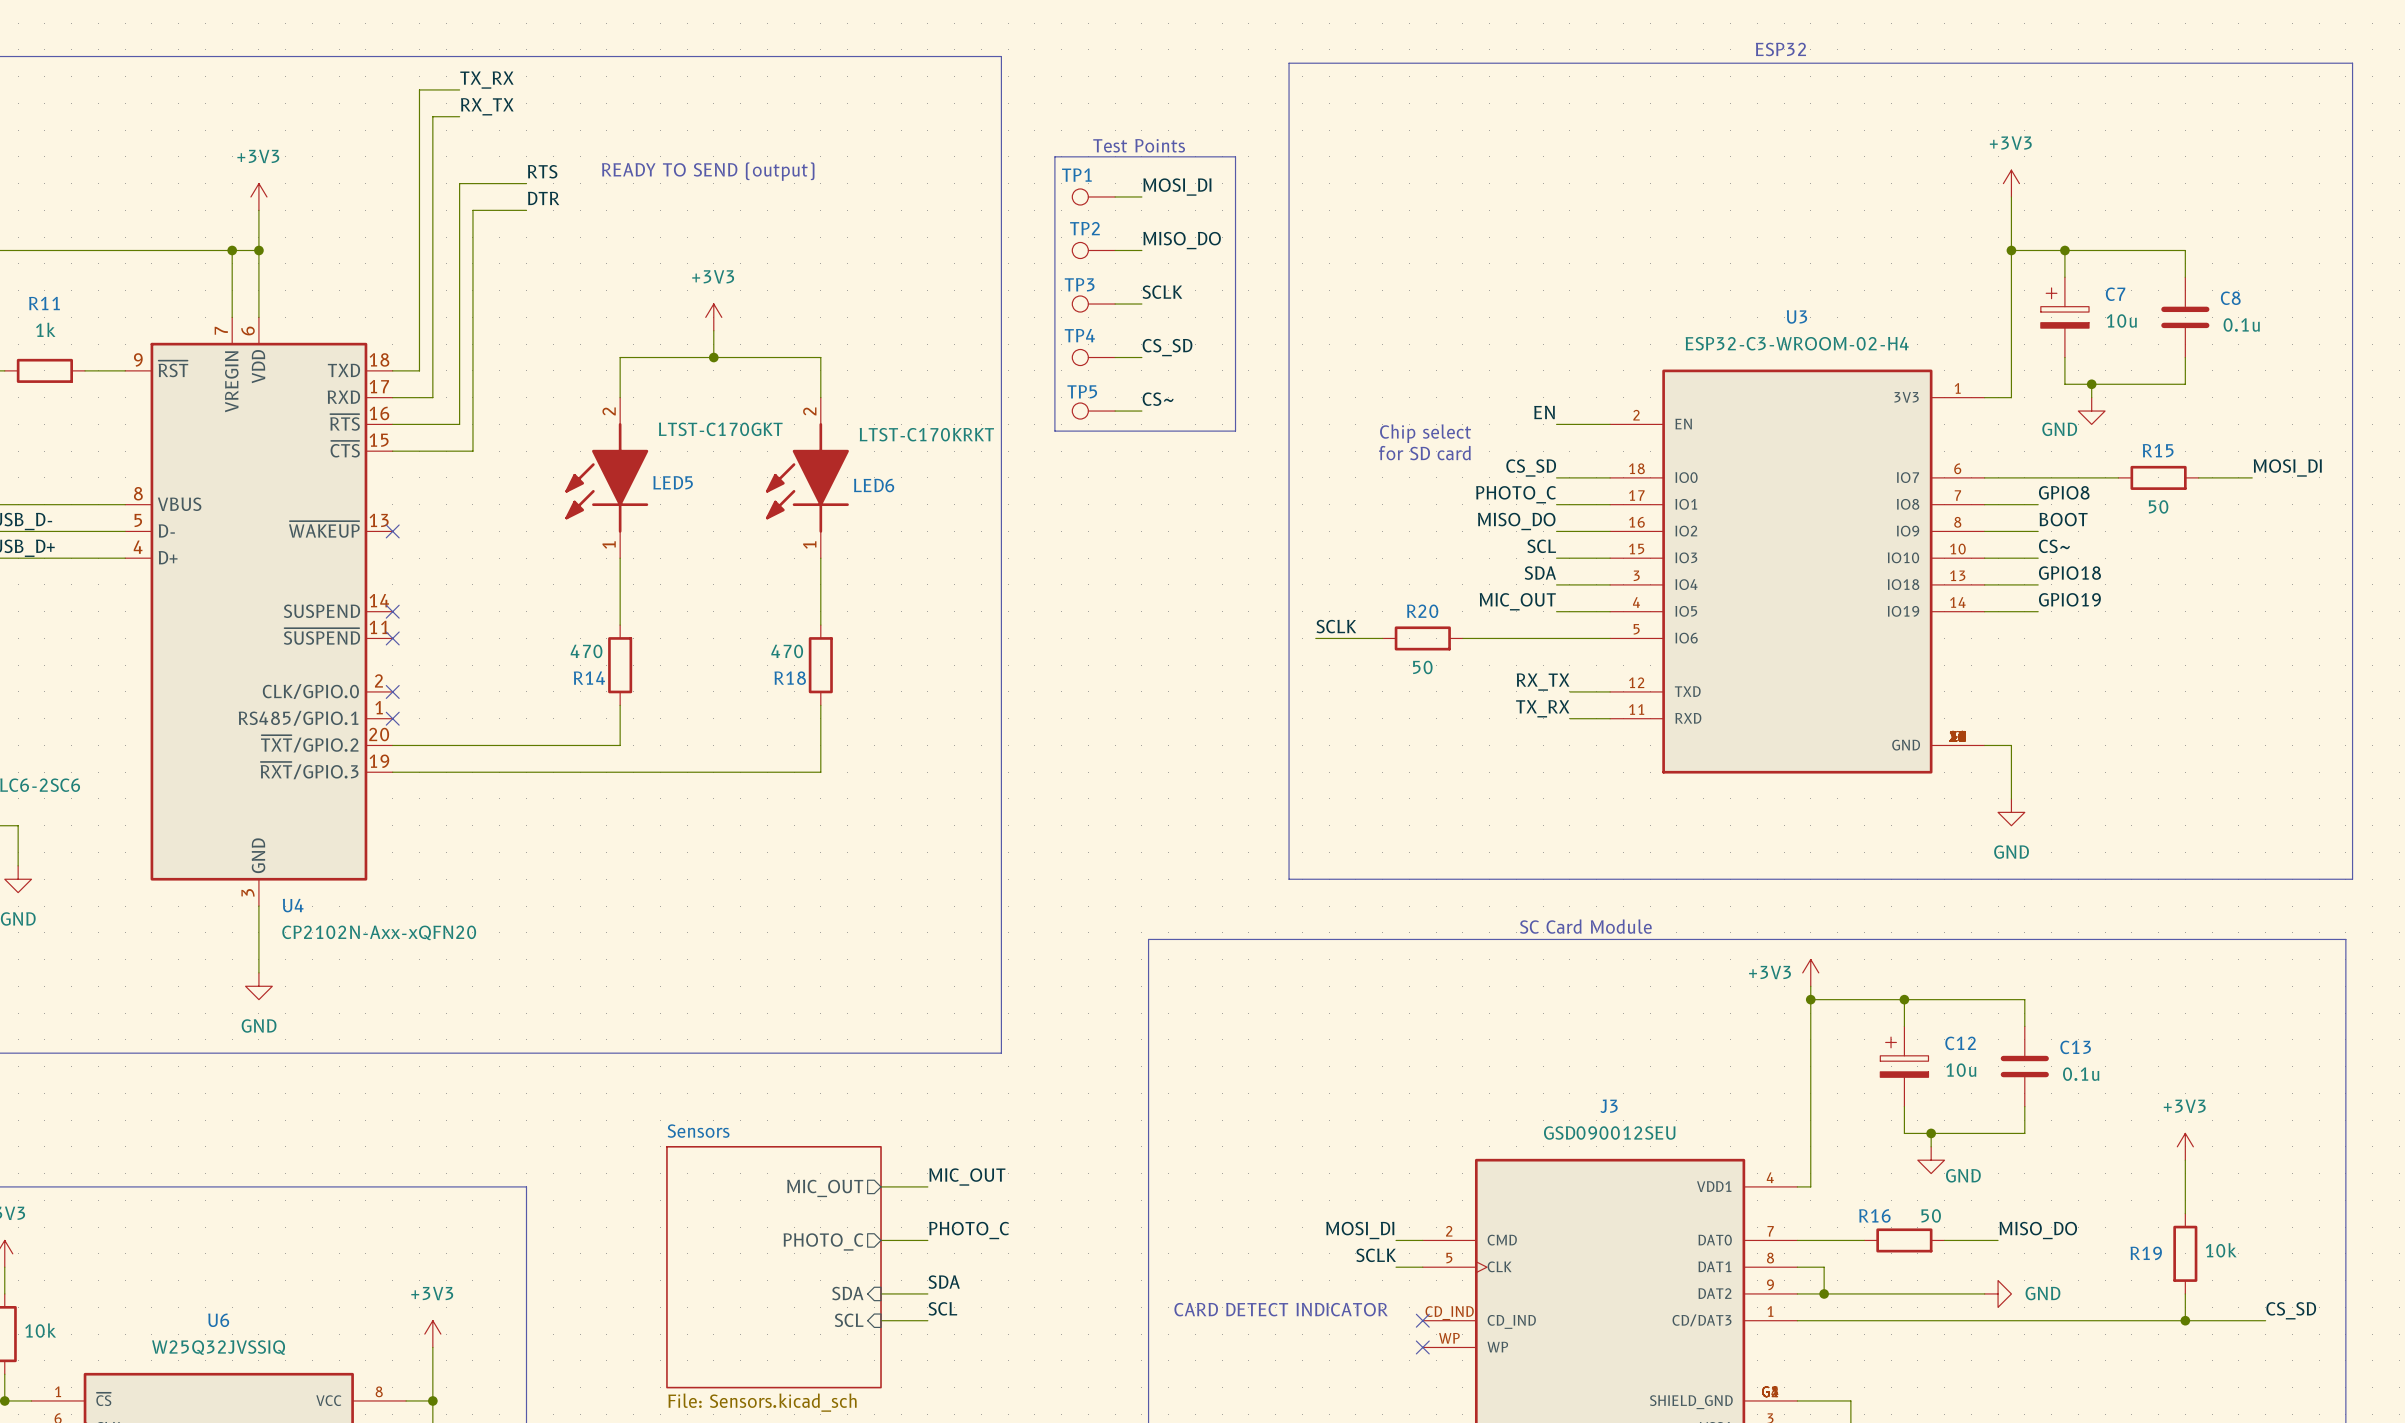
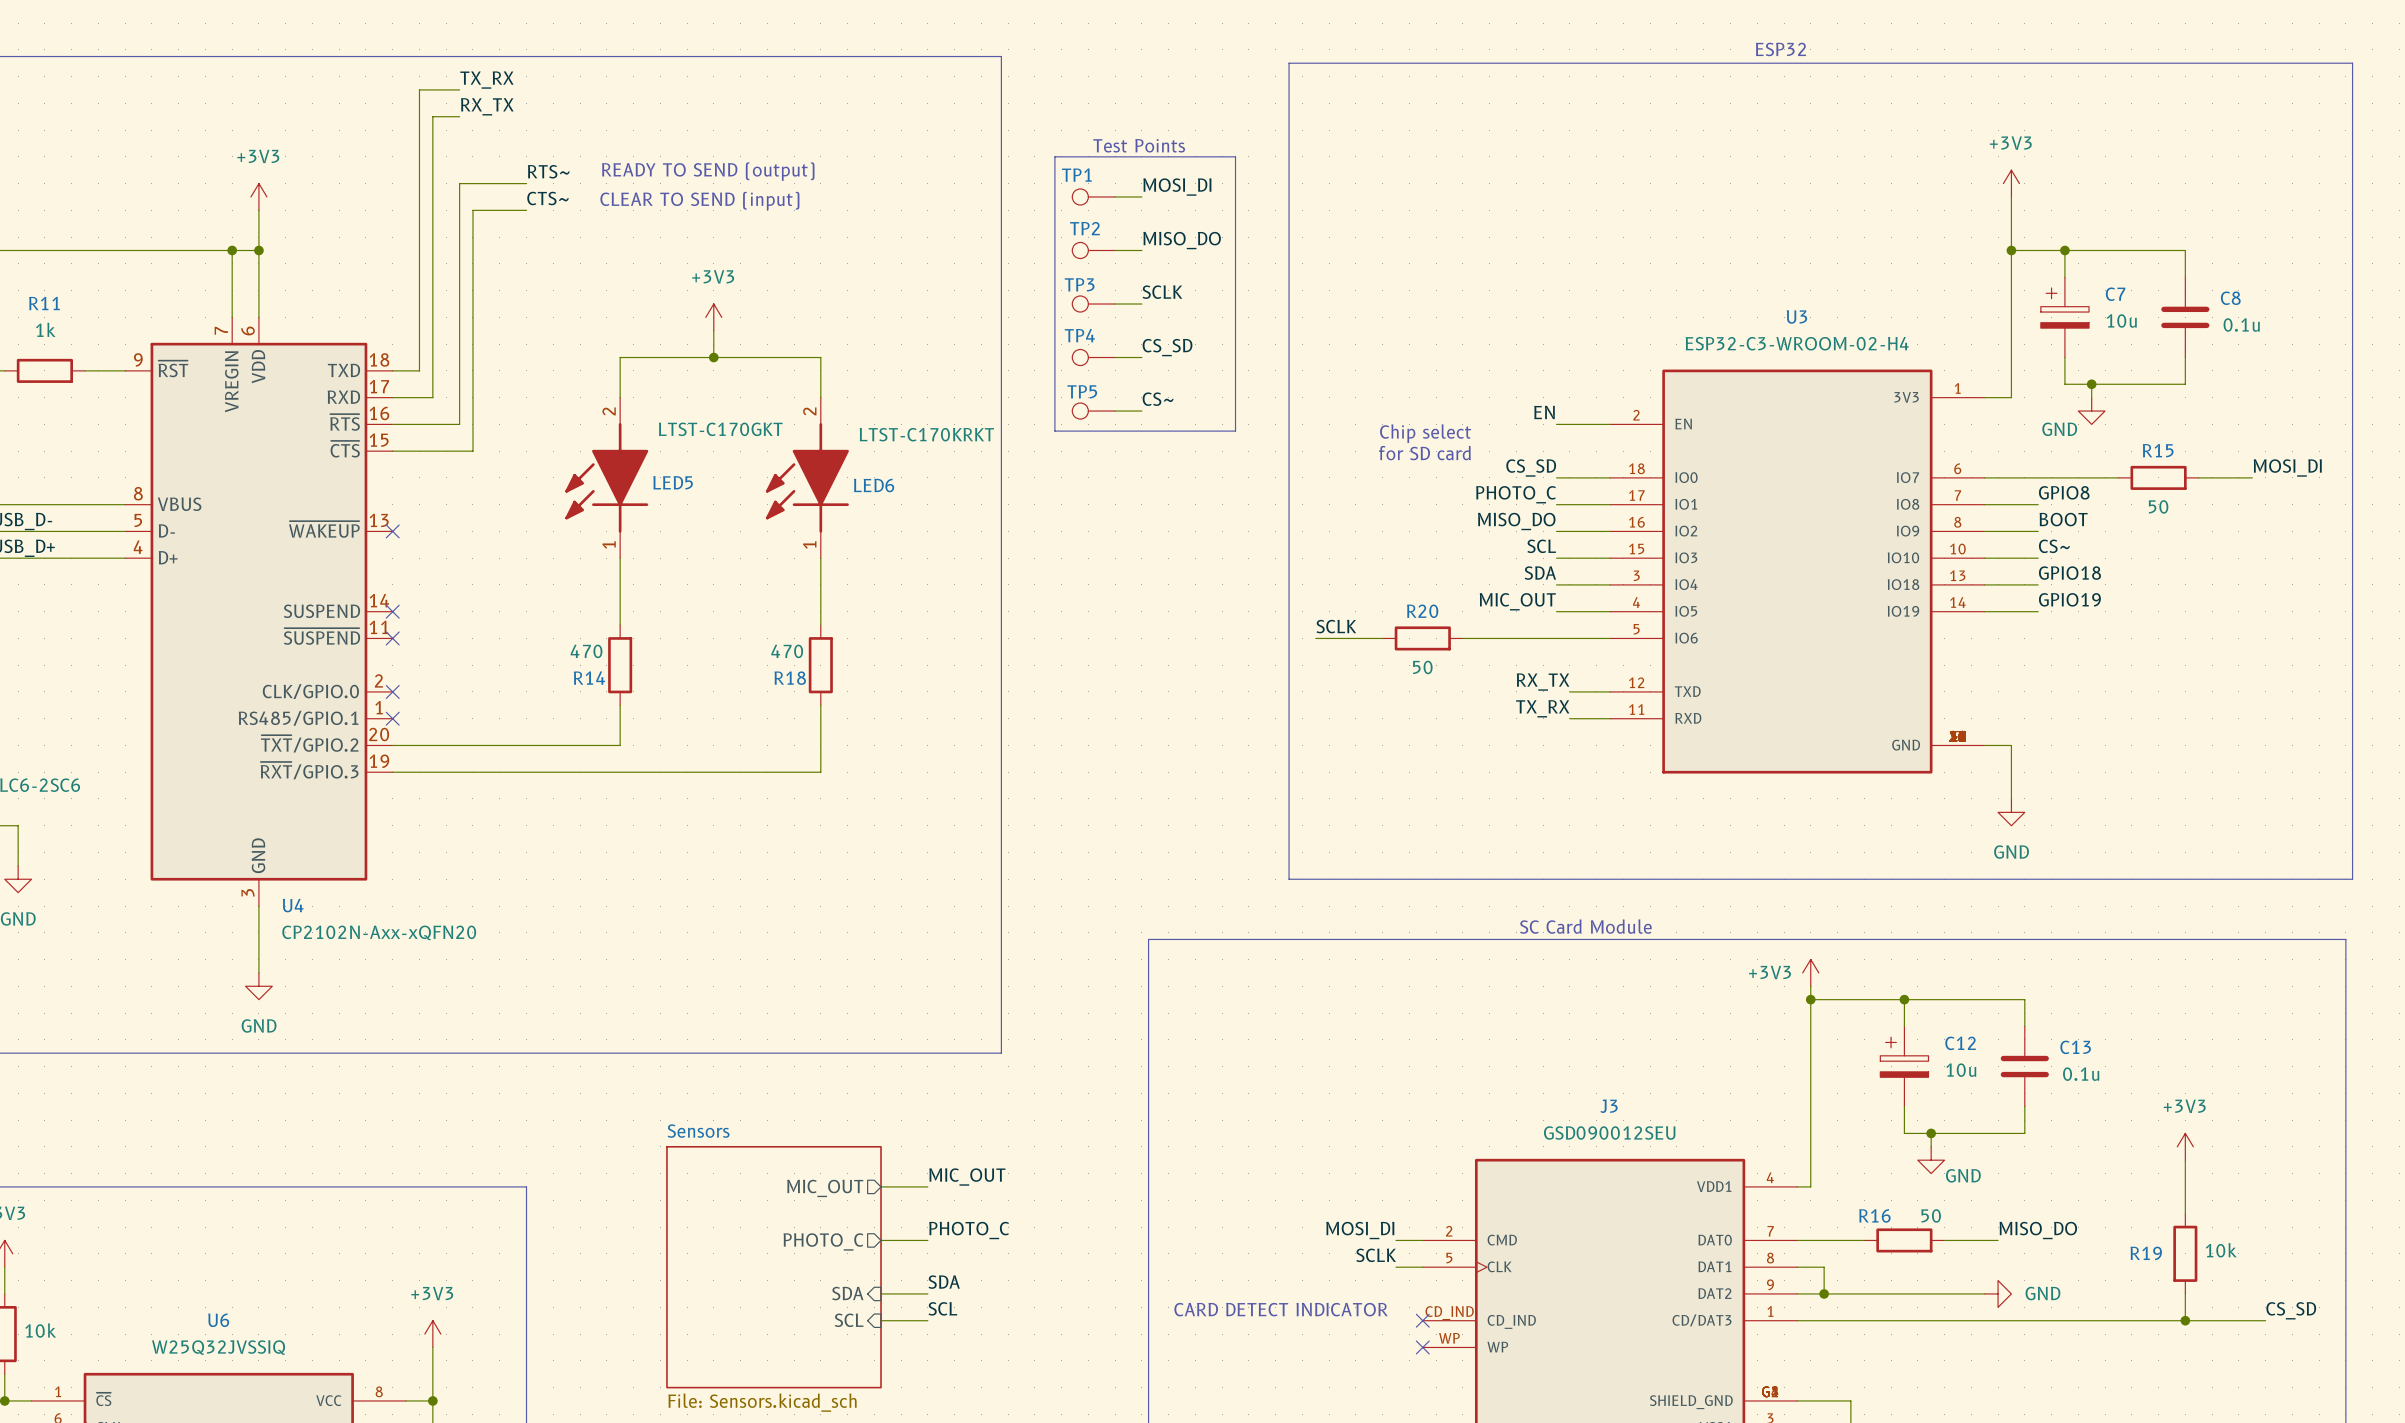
label: RTS (542, 171) -> RTS~ (548, 171)
label: DTR (543, 198) -> CTS~ (548, 198)
text: none -> CLEAR TO SEND (input) (699, 201)

